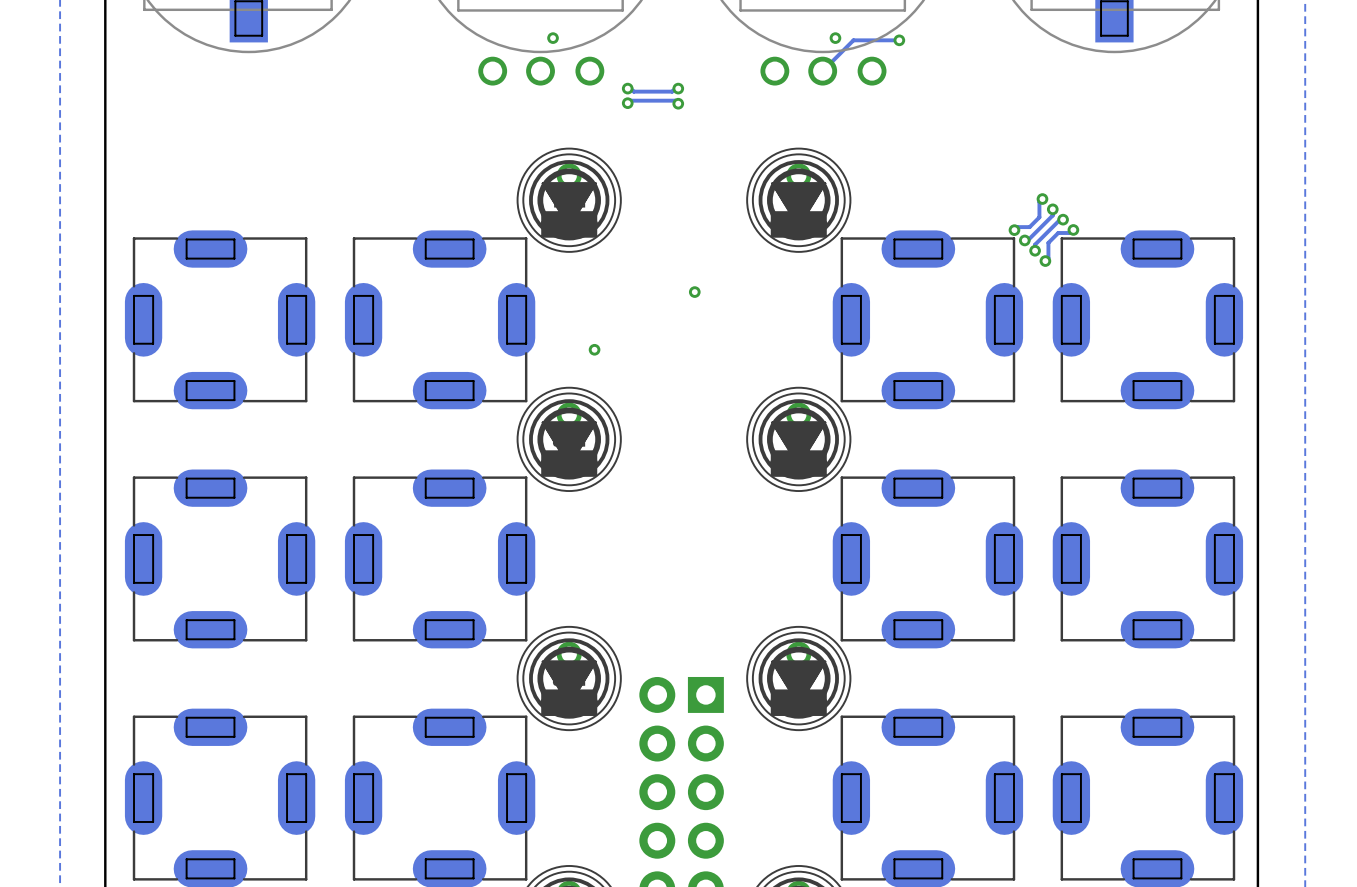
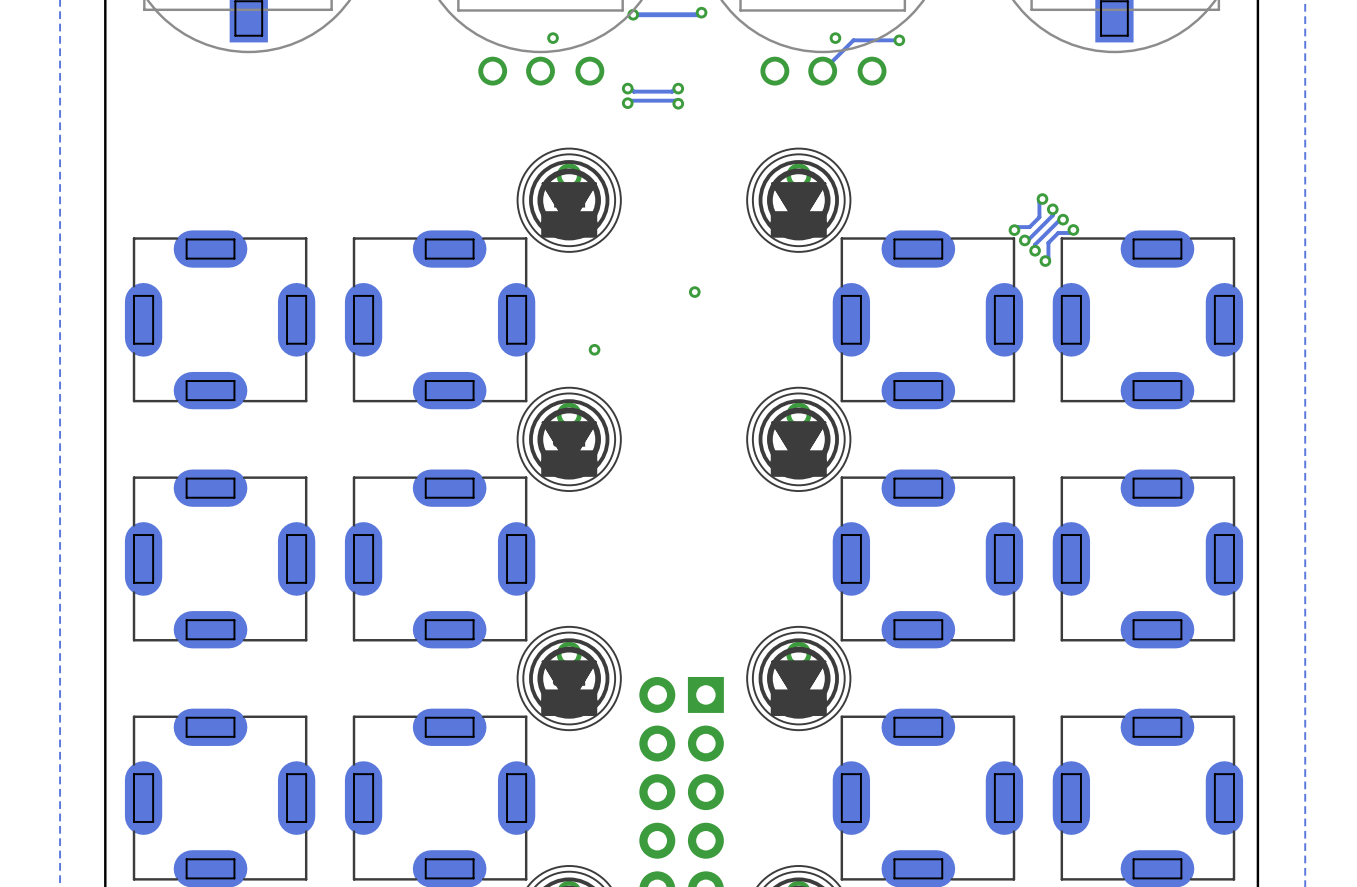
track: none -> (701, 12) (699, 14) (633, 14)
via: none -> (701, 12)
via: none -> (633, 14)

